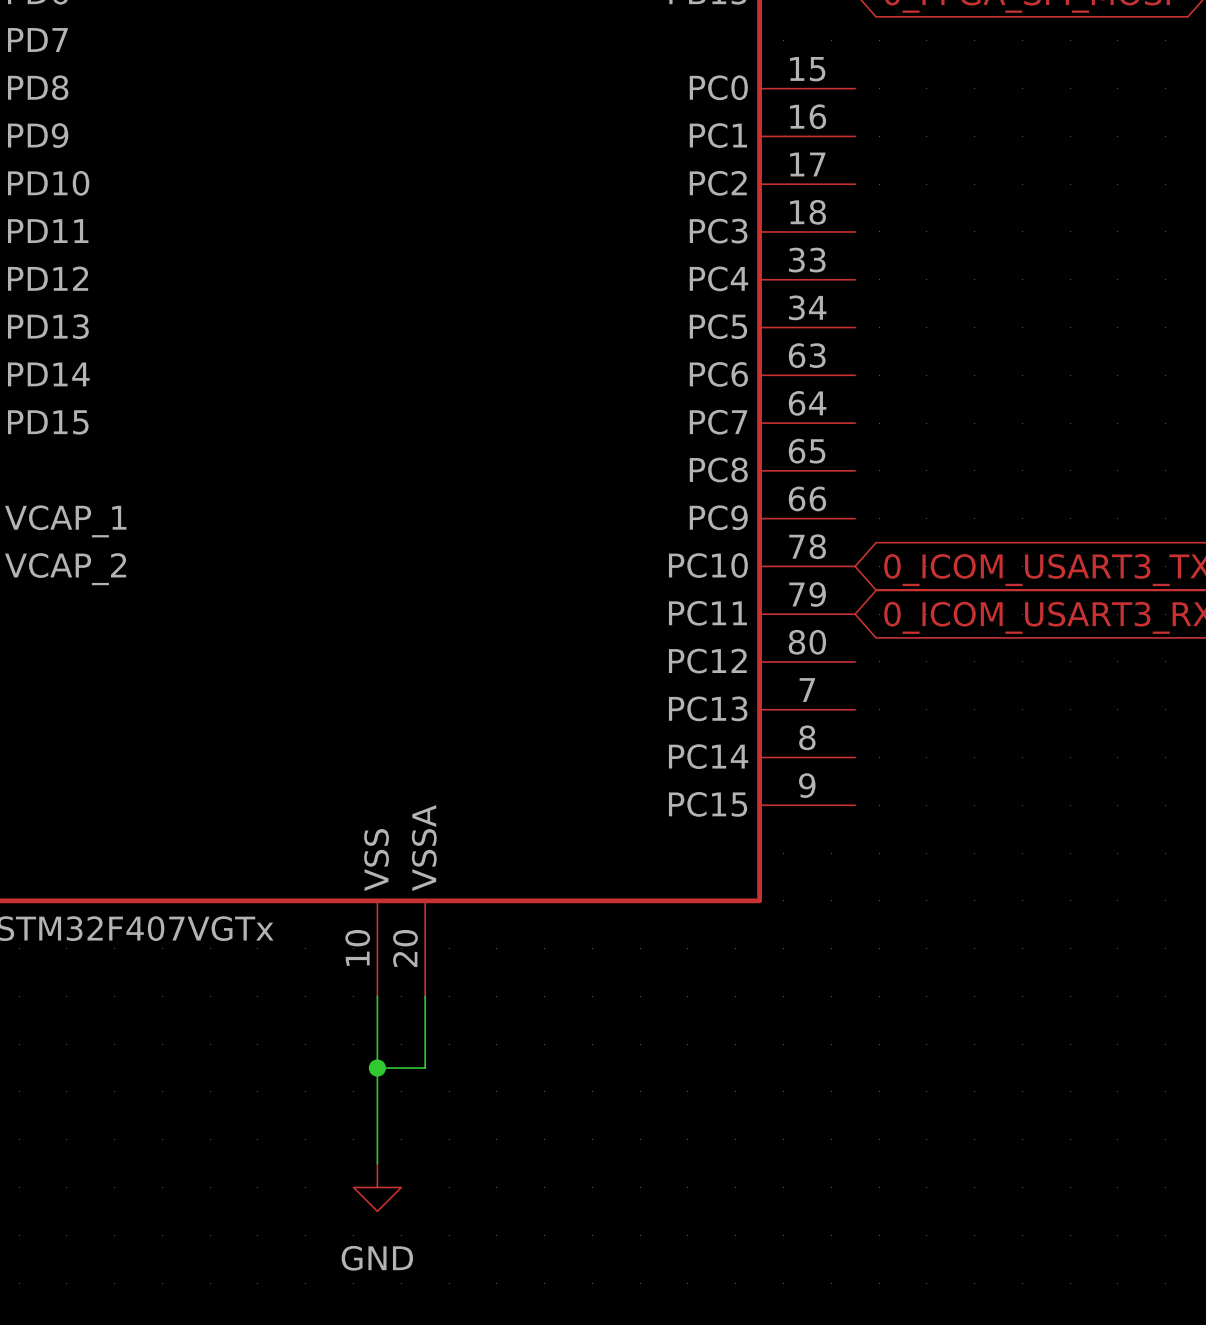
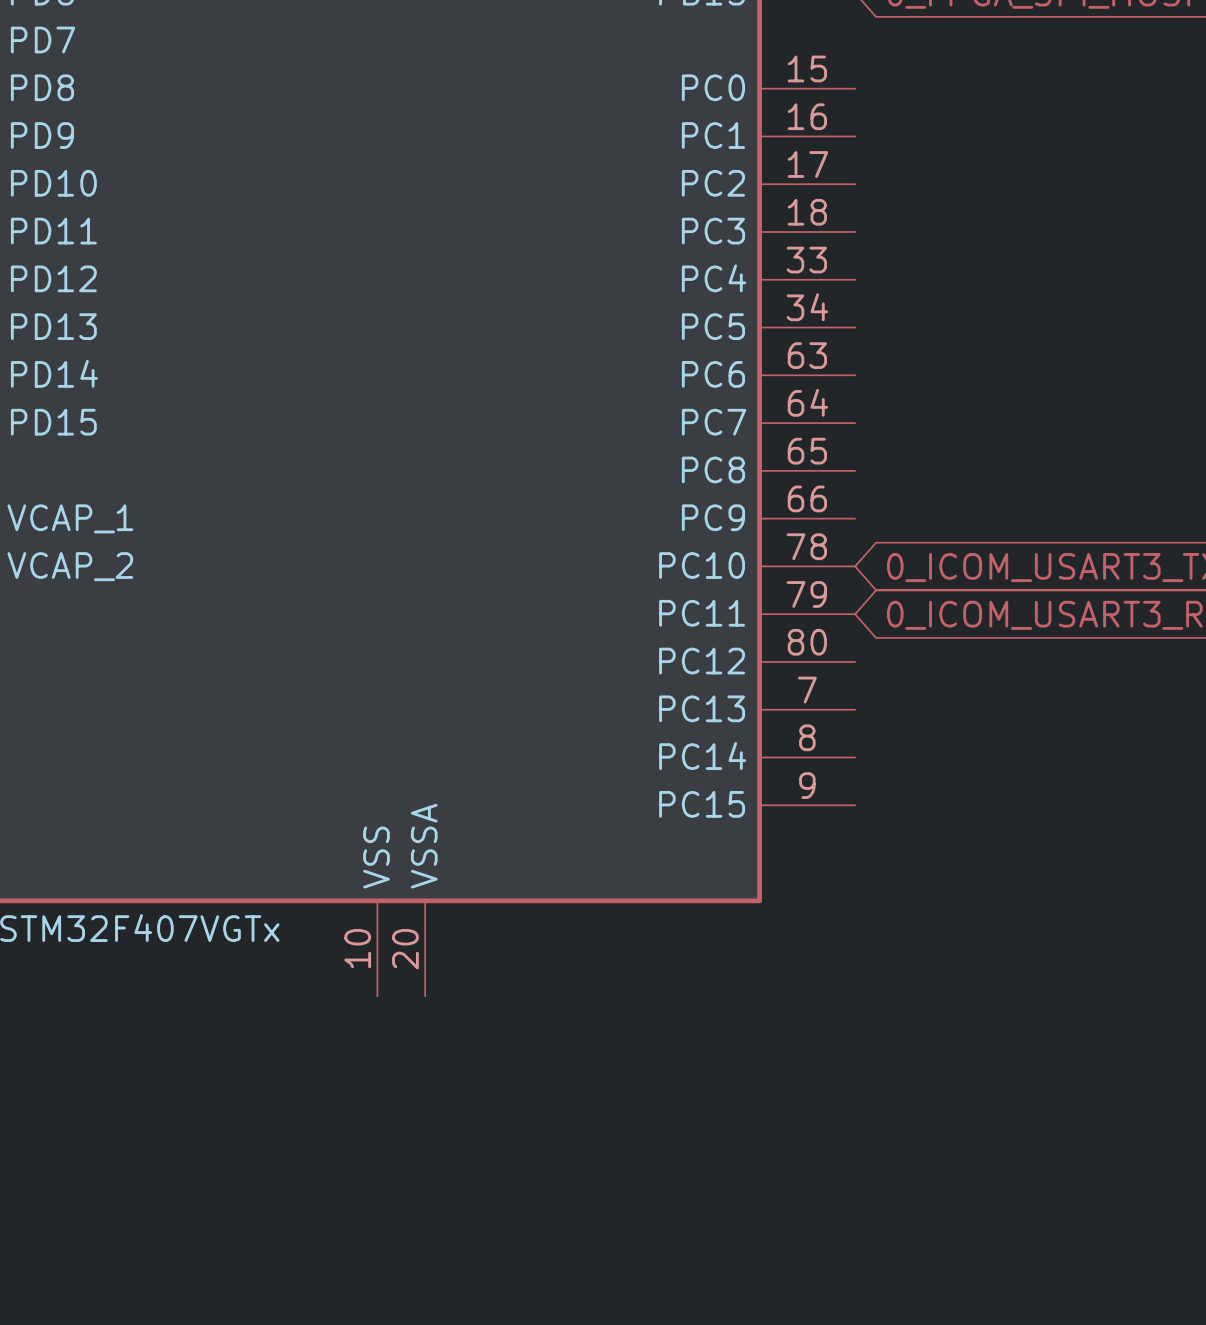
wire: (377, 996) (377, 1163) -> none
wire: (425, 996) (425, 1068) (377, 1068) -> none
junction: (377, 1068) -> none
power symbol: GND (377, 1187) -> none

